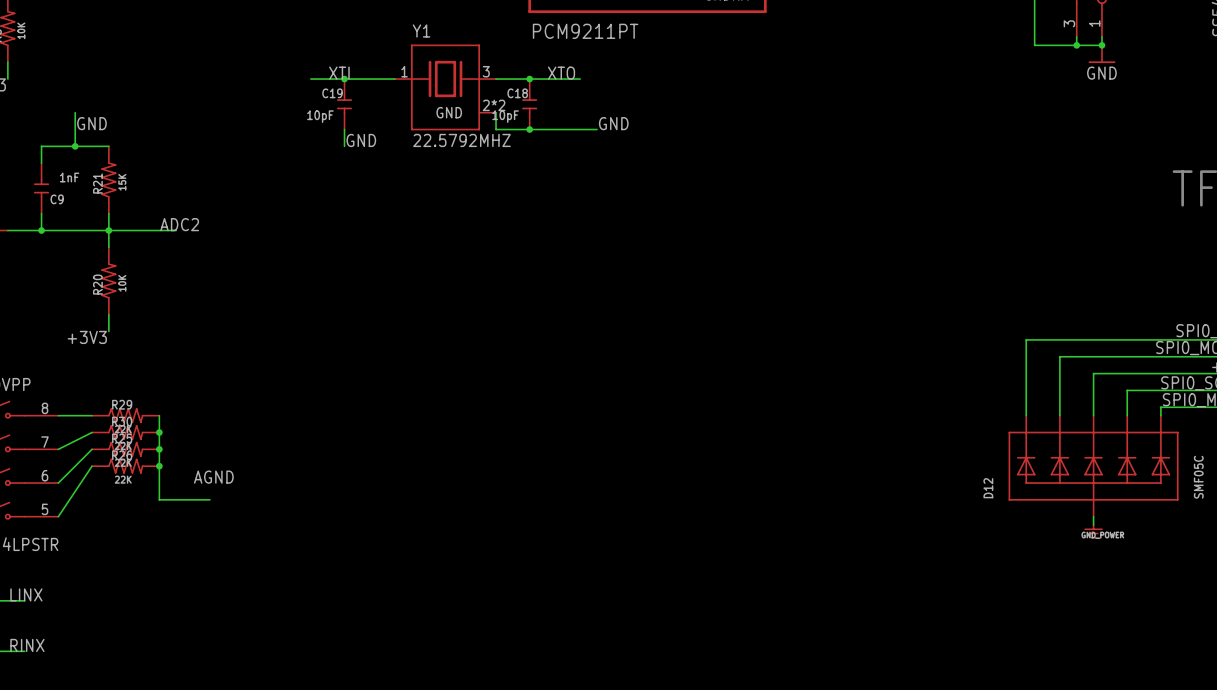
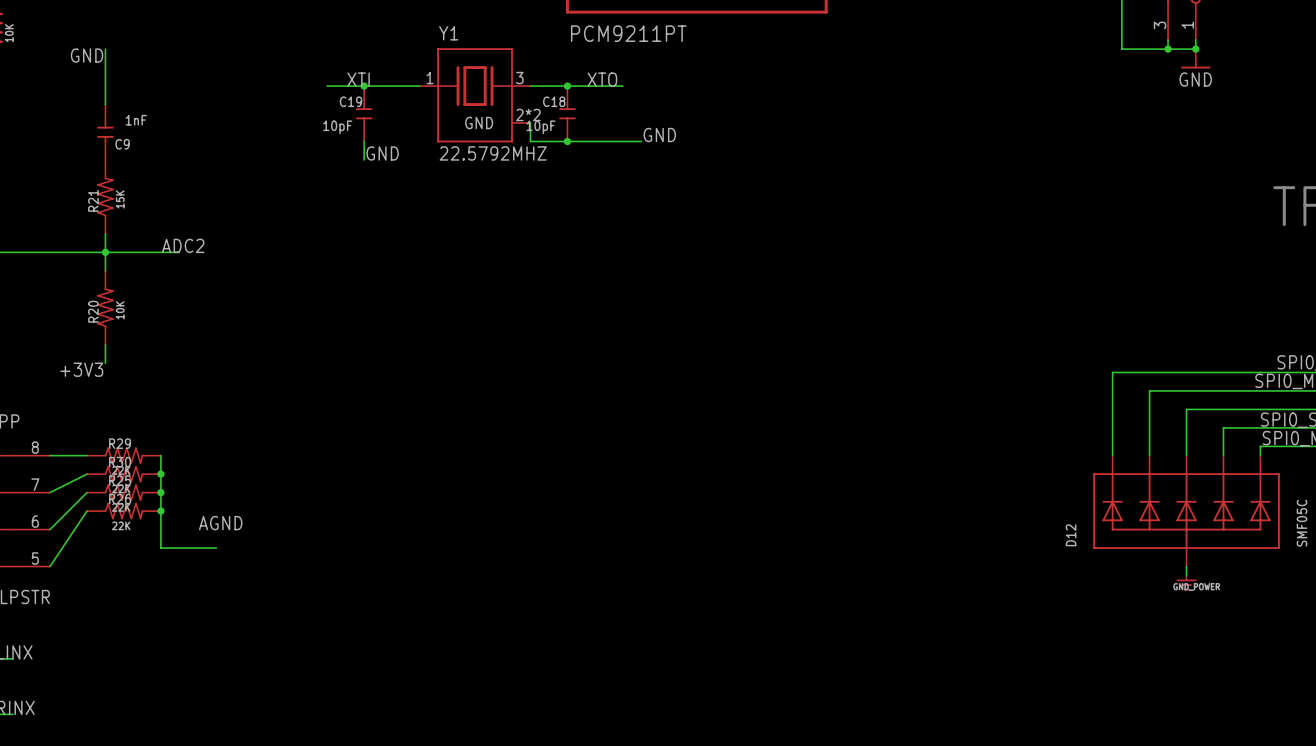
wire: none -> (105, 49) (105, 104)
wire: (75, 112) (75, 146) -> none
label position: GND (91, 123) -> GND (87, 55)
junction: (75, 146) -> none
wire: (108, 146) (41, 146) (41, 163) -> none
C9 position: (41, 188) -> (105, 132)
wire: (41, 213) (41, 230) -> none
junction: (41, 230) -> none

